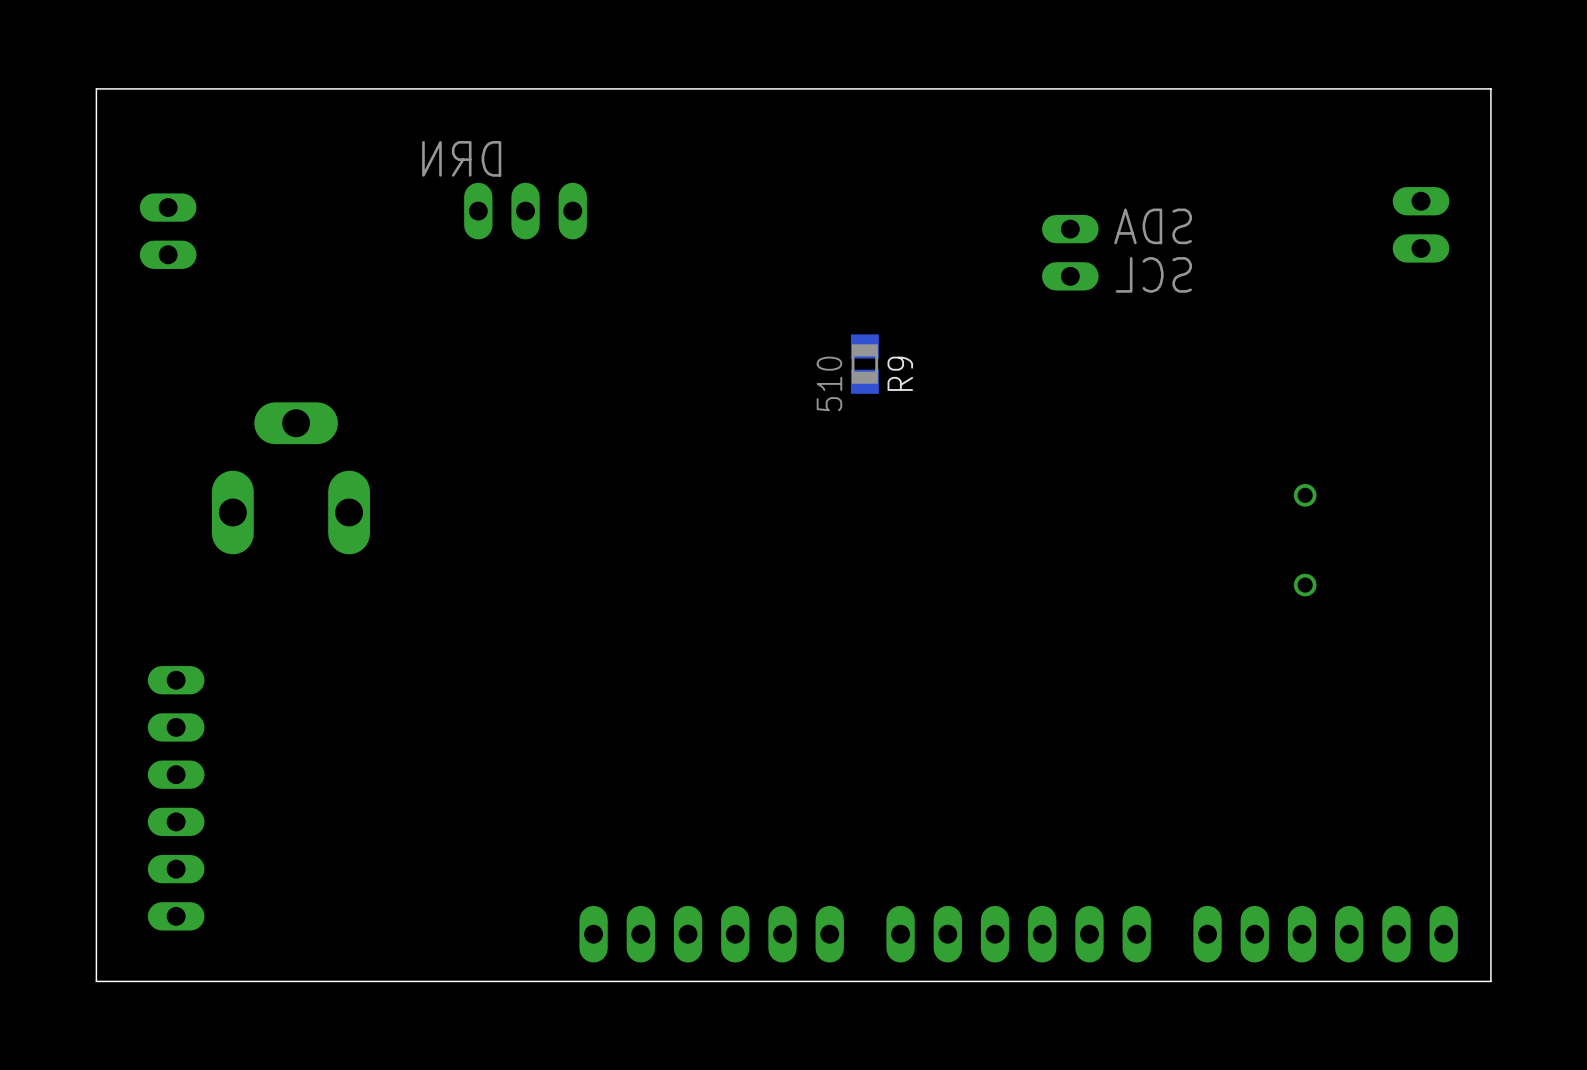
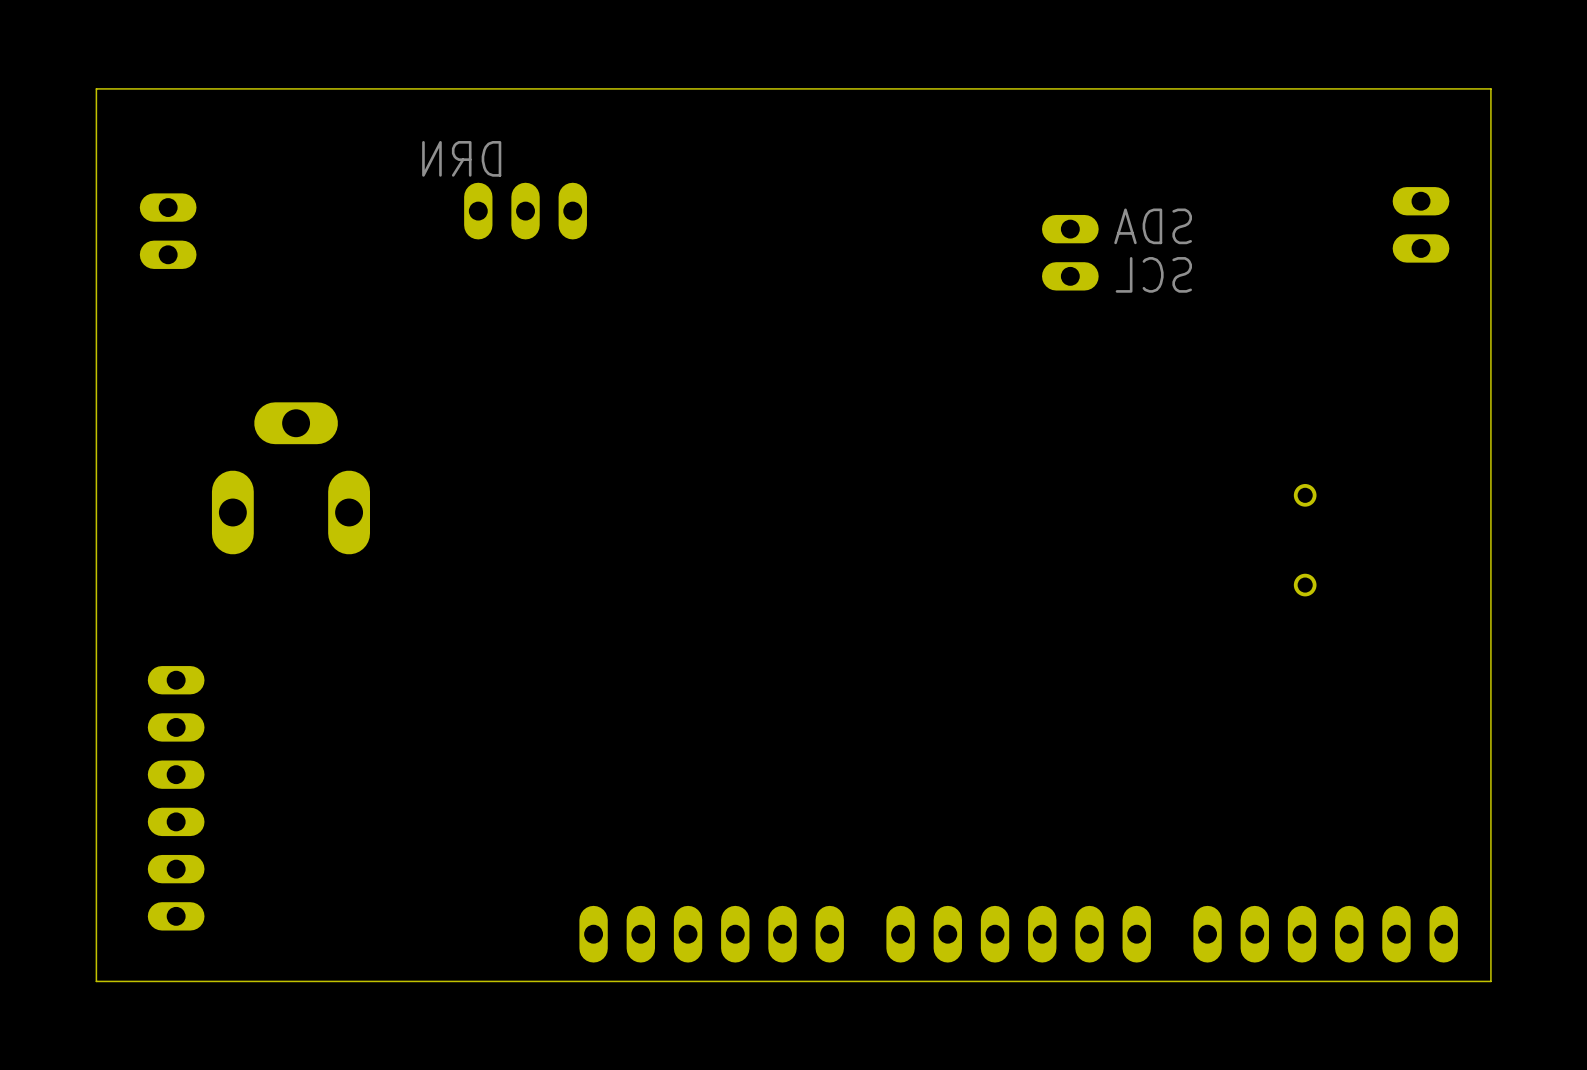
R9: 510 (864, 364) -> none

